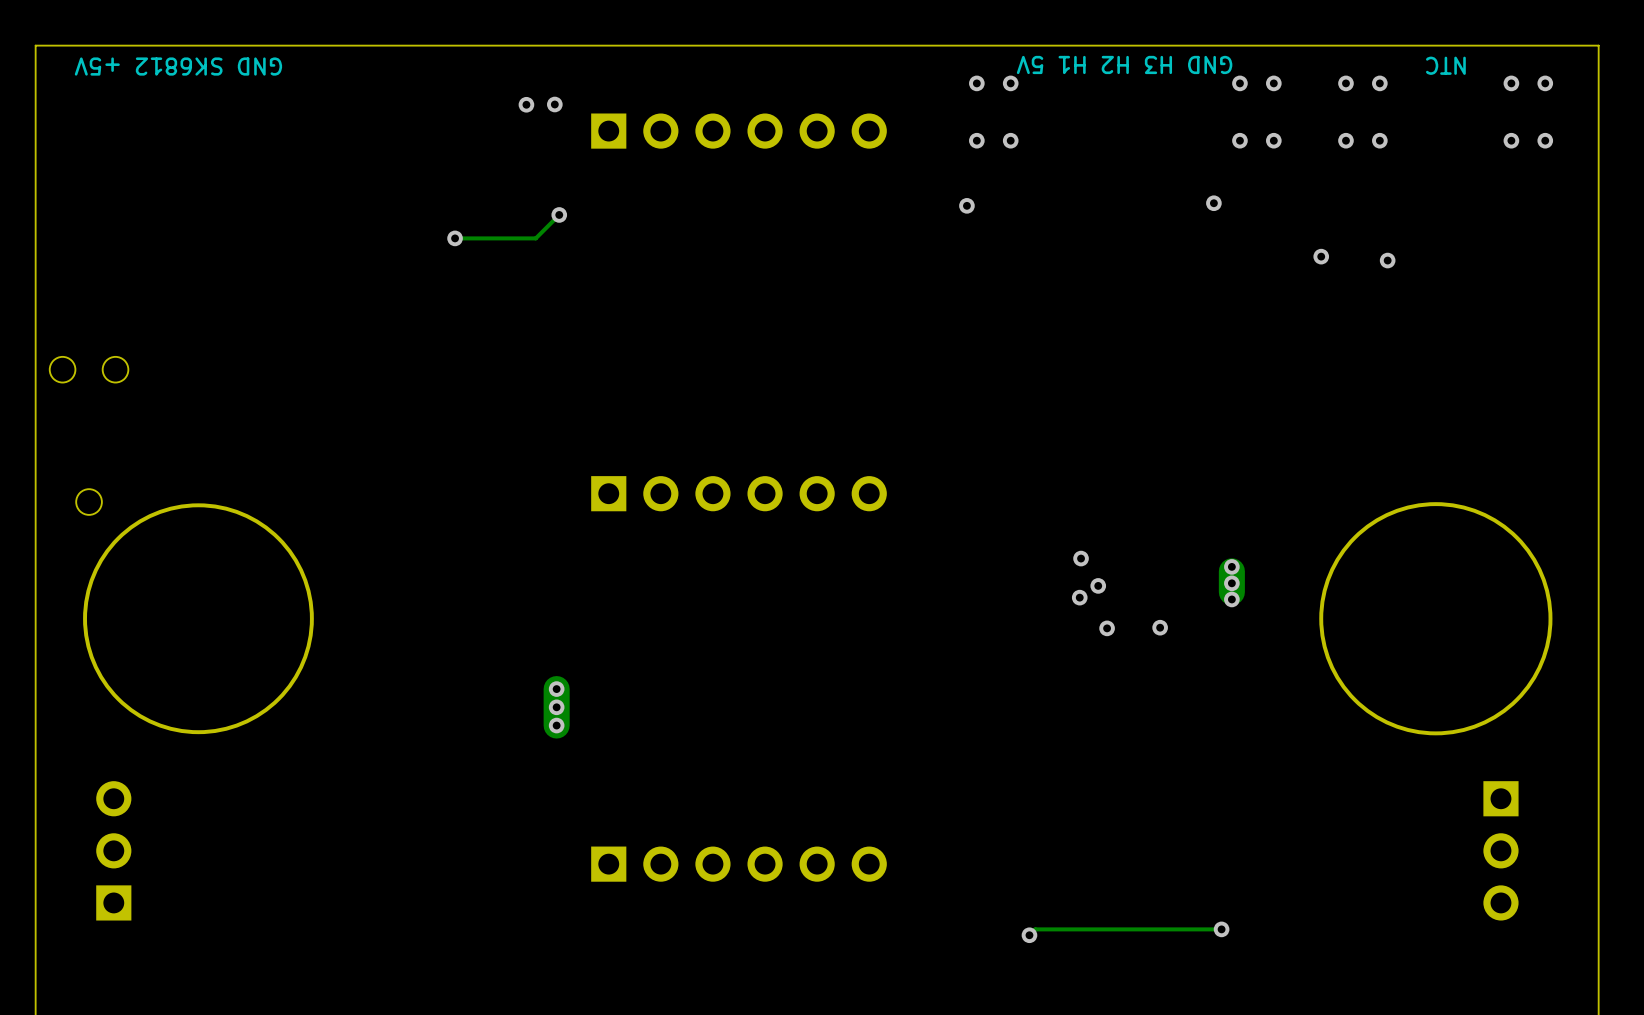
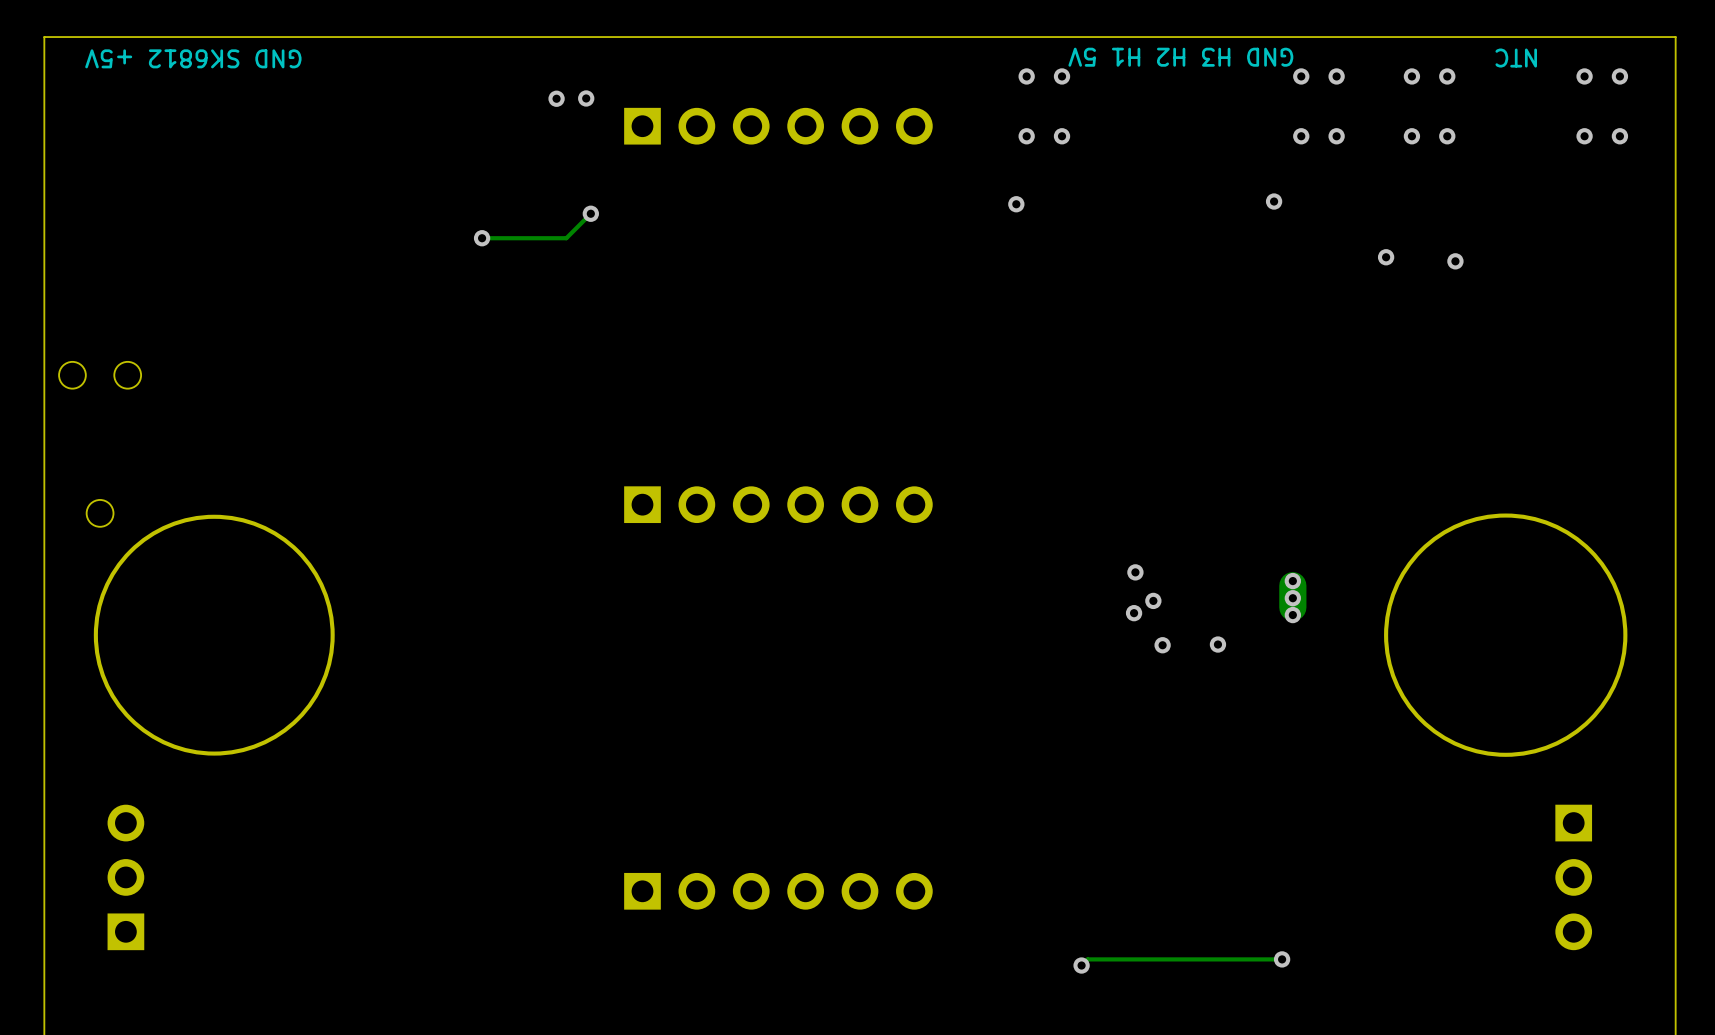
track: (556, 689) (556, 725) -> none
via: (556, 689) -> none
via: (556, 707) -> none
via: (556, 725) -> none

